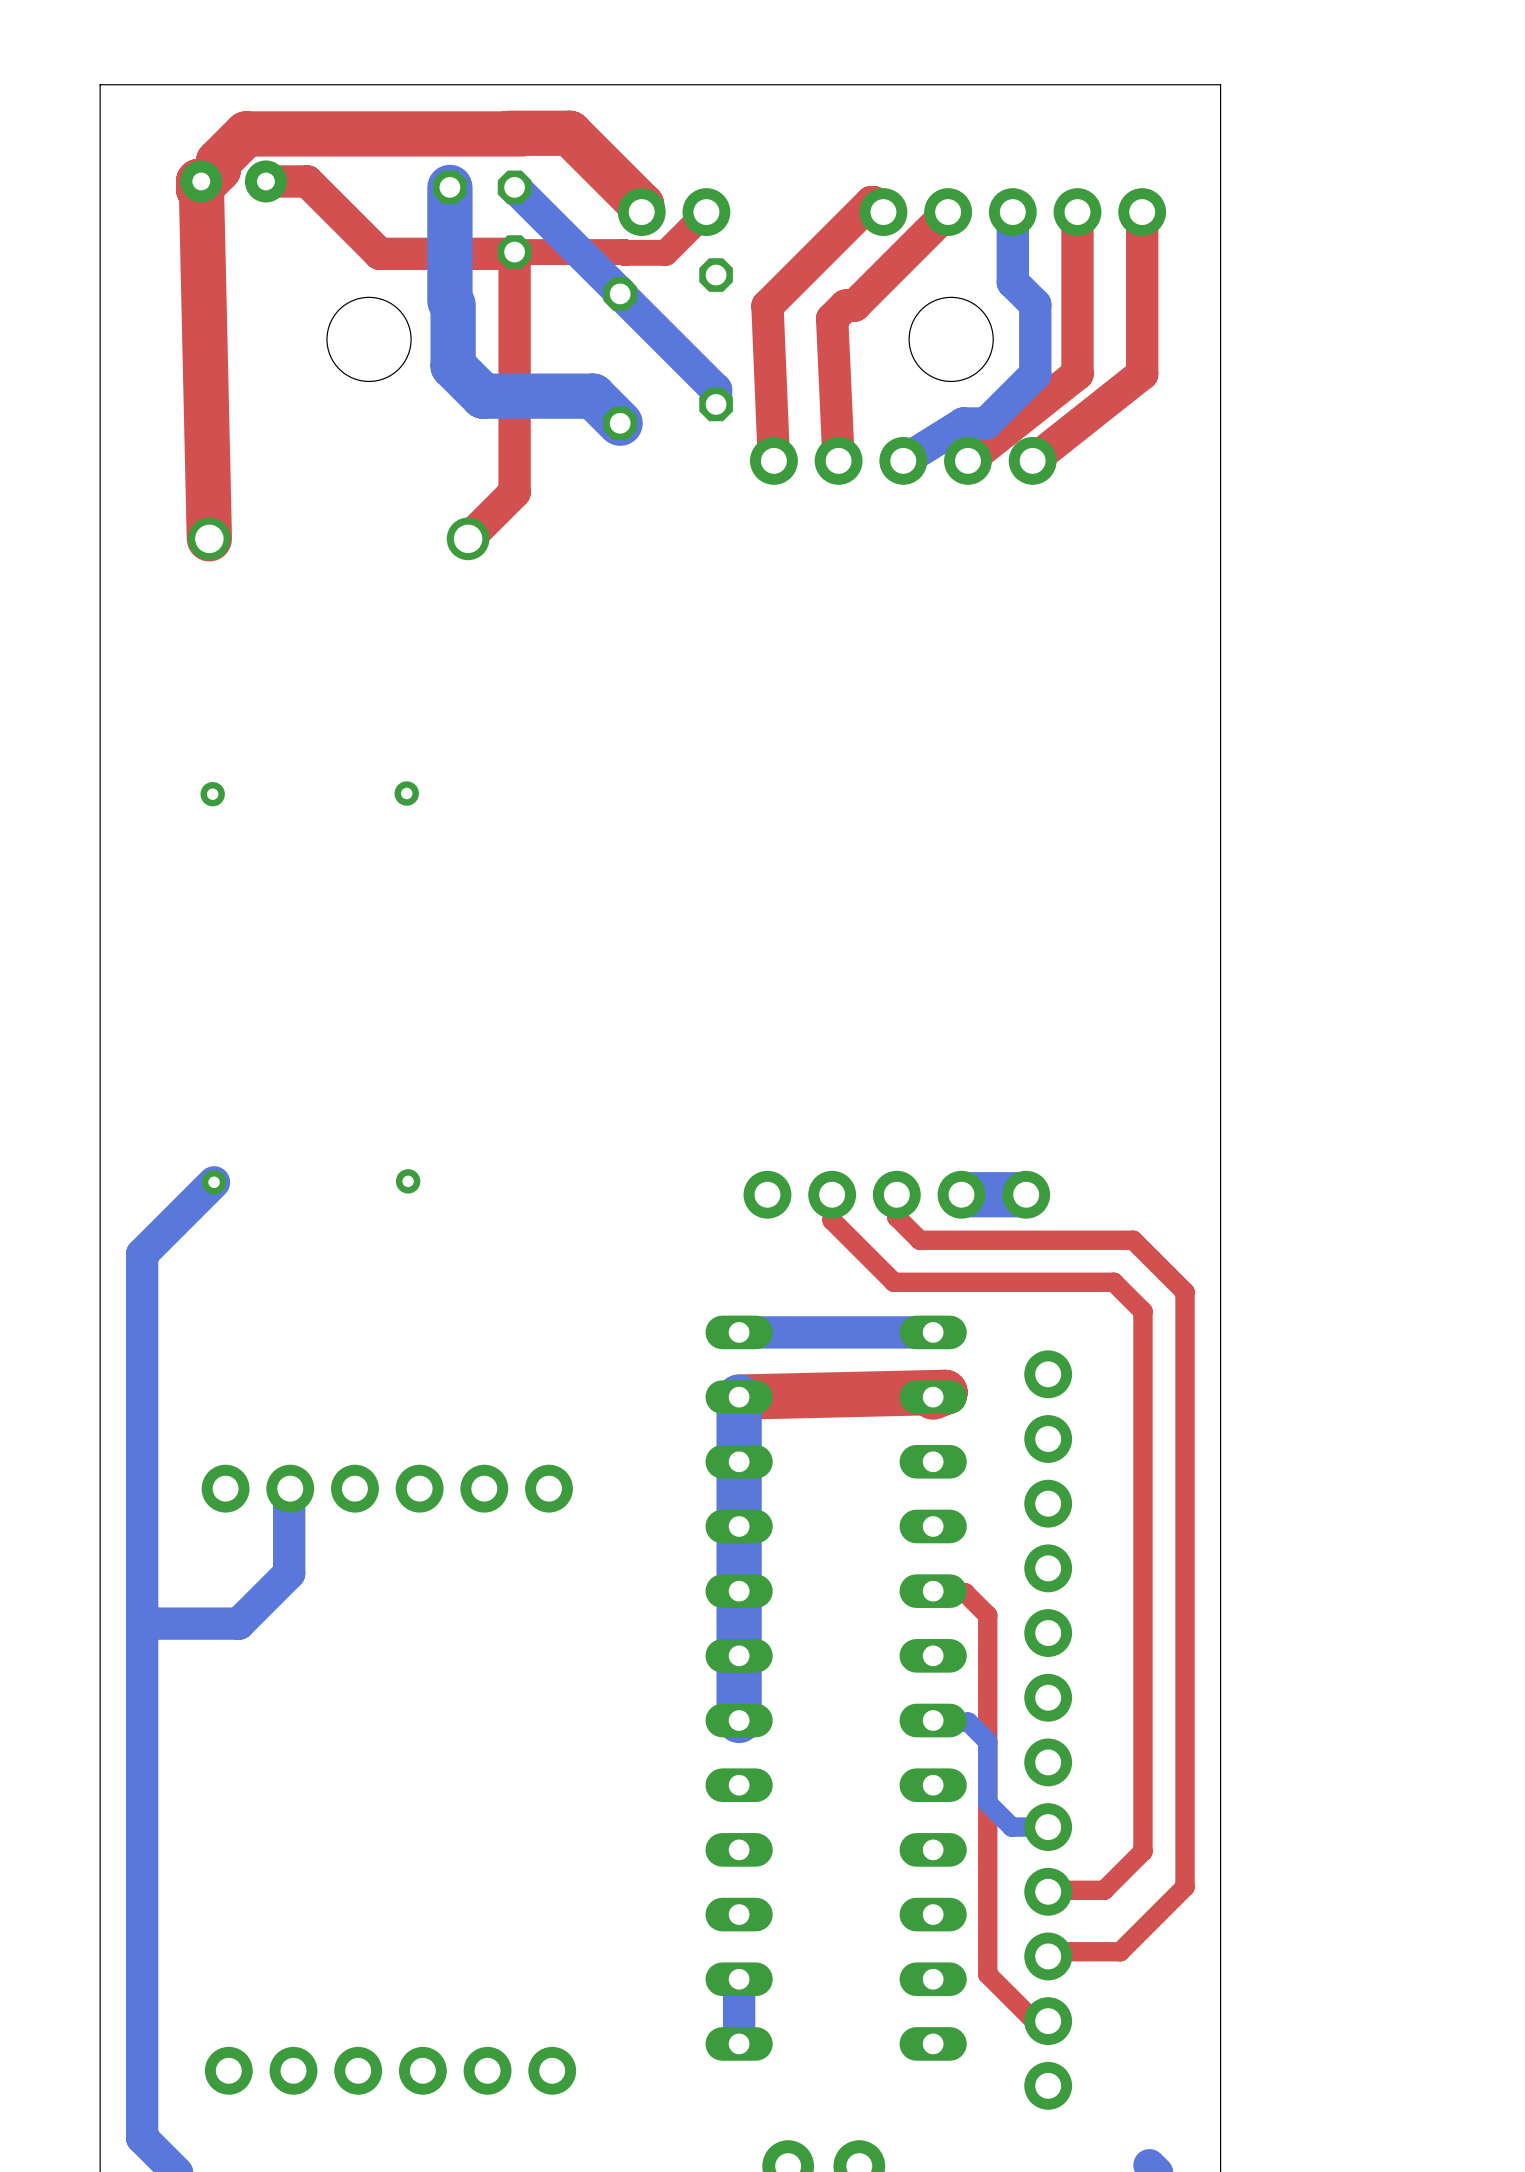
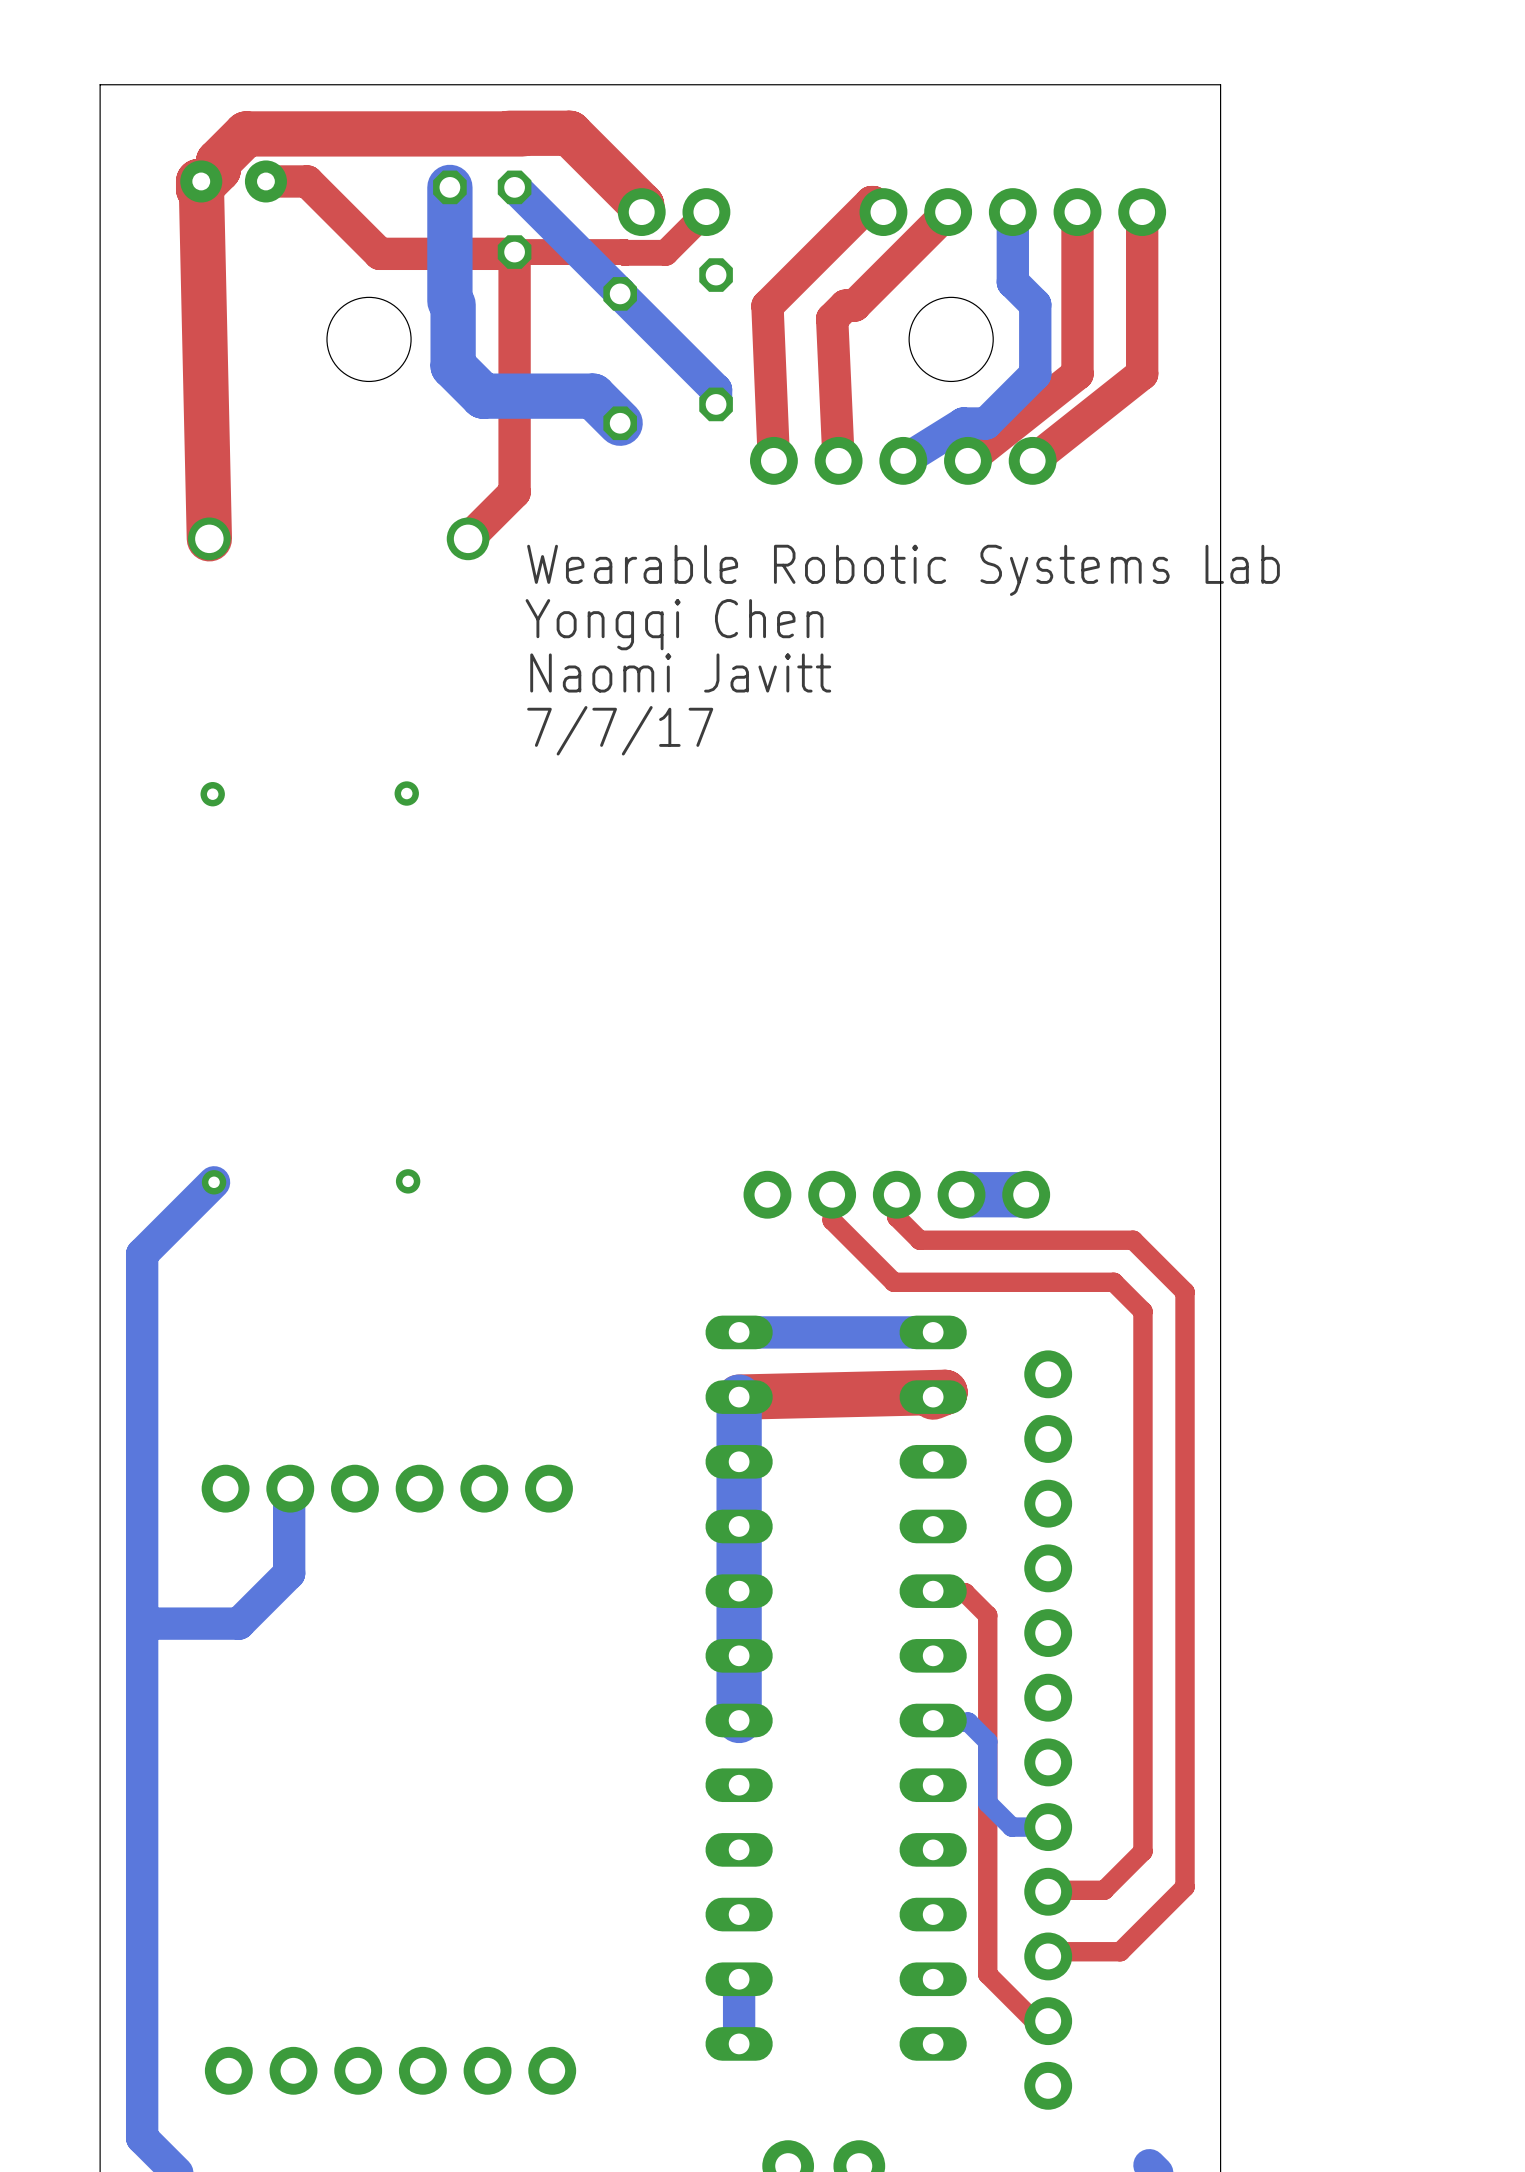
text: none -> Wearable Robotic Systems Lab (903, 570)
text: none -> Yongqi Chen (674, 624)
text: none -> Naomi Javitt (680, 672)
text: none -> 7/7/17 (620, 730)

